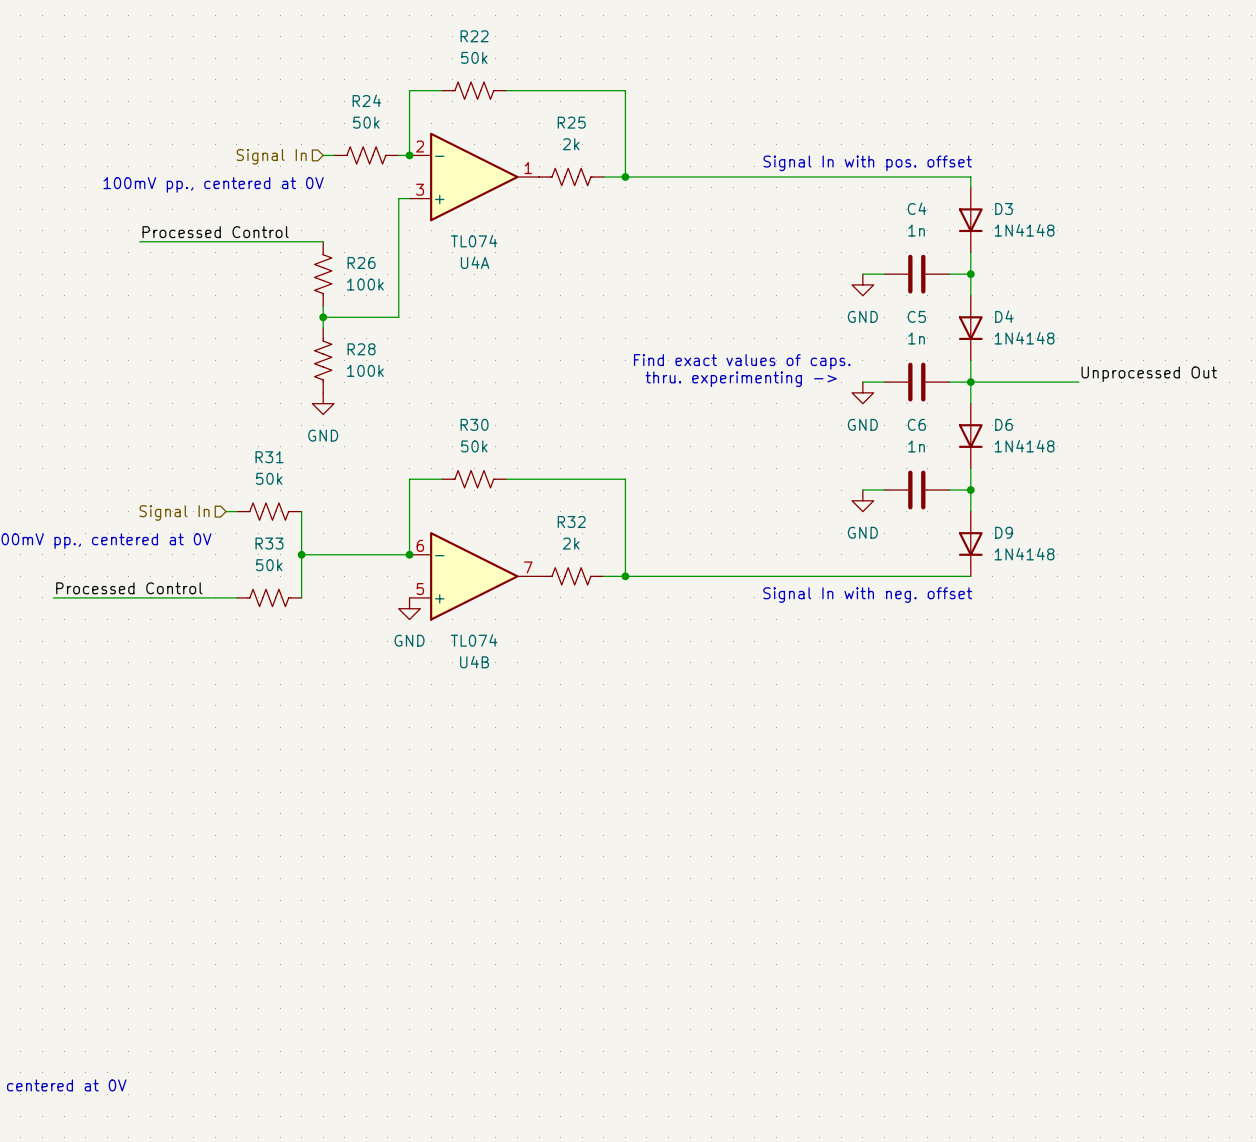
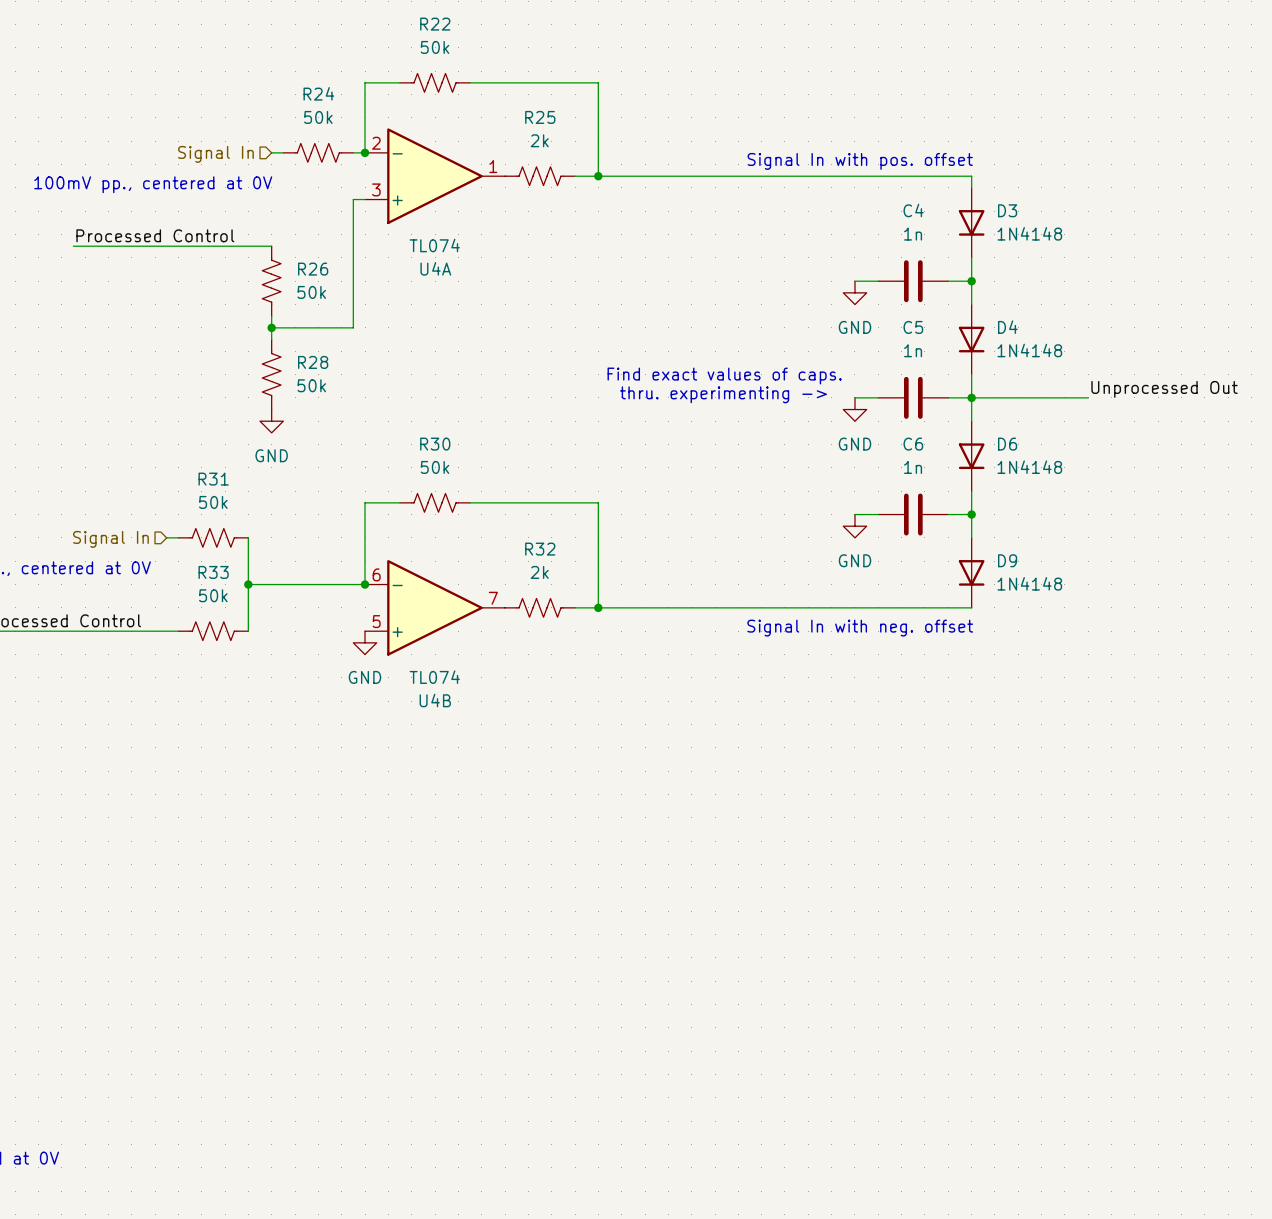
R26 value: 100k (365, 284) -> 50k (311, 292)
R28 value: 100k (365, 370) -> 50k (311, 385)

